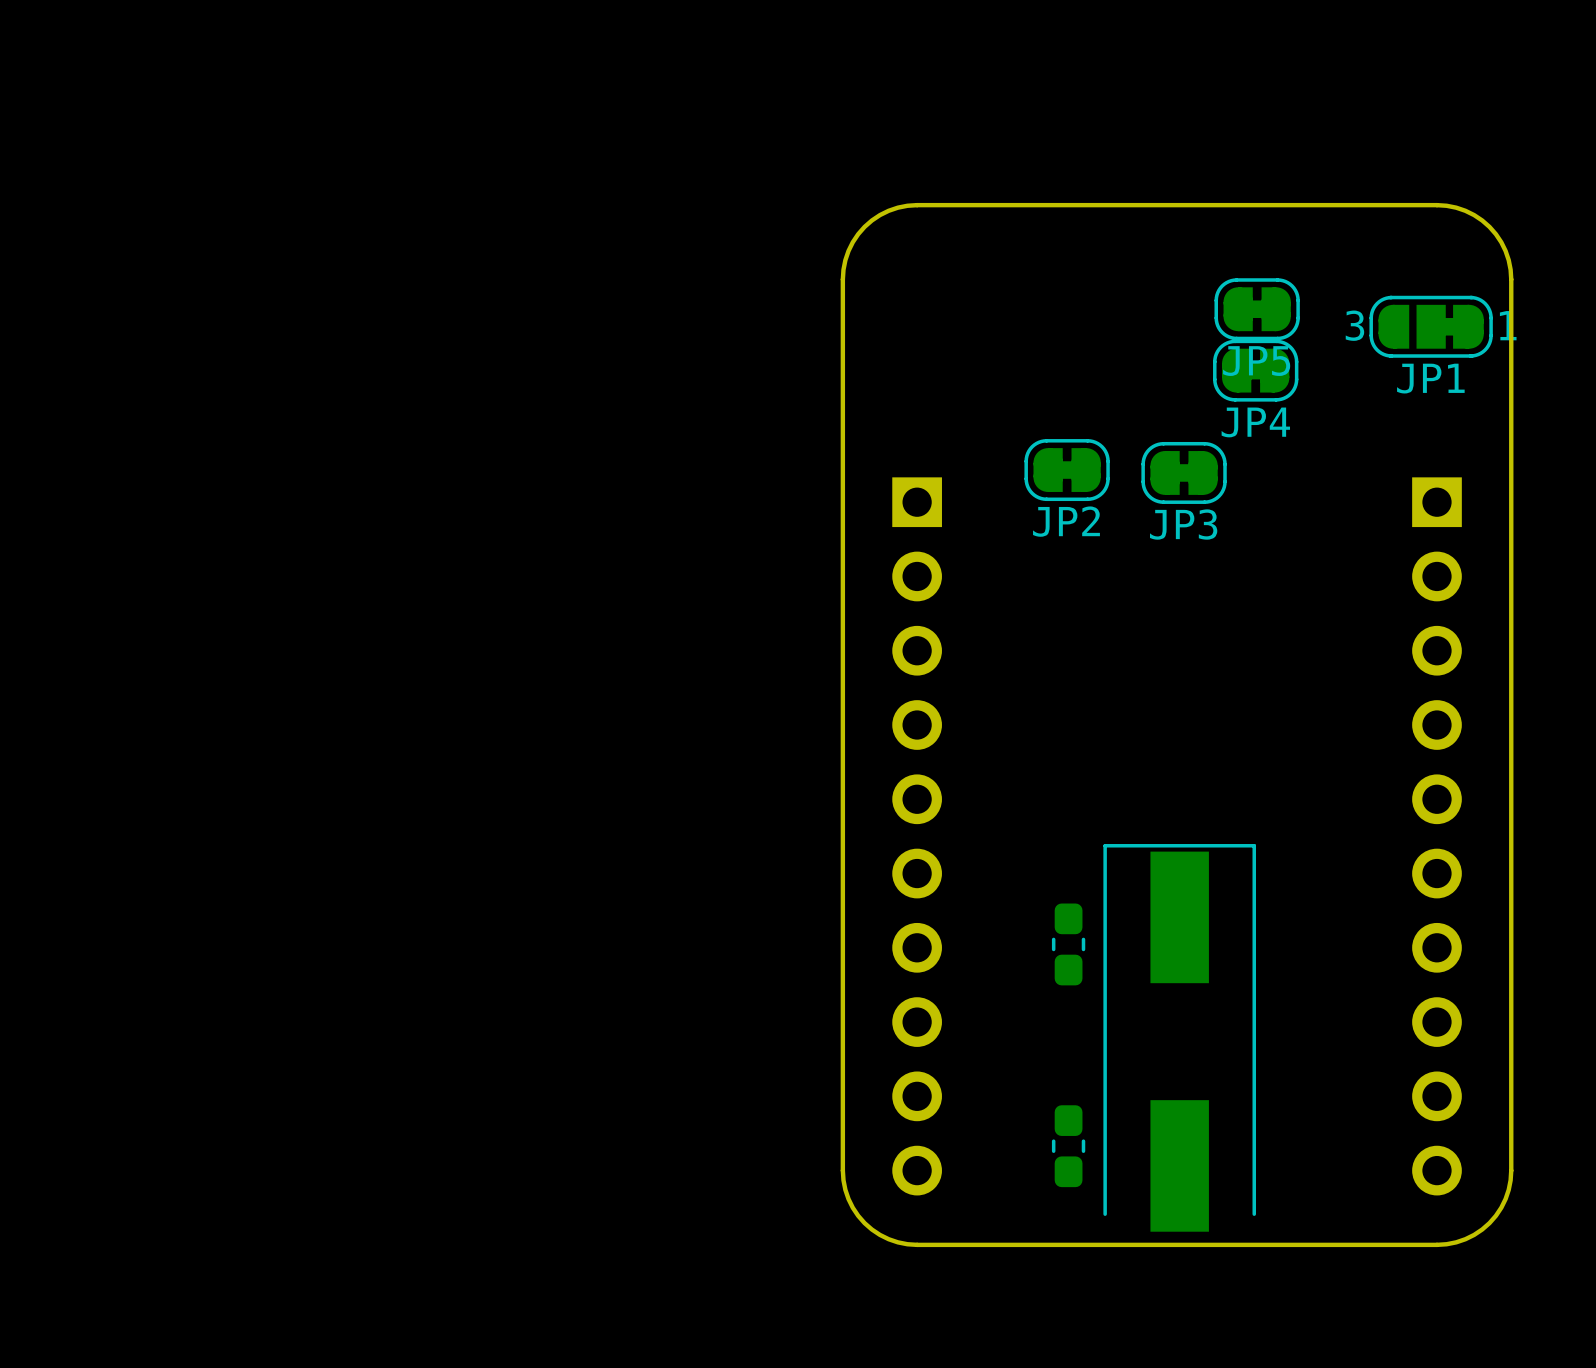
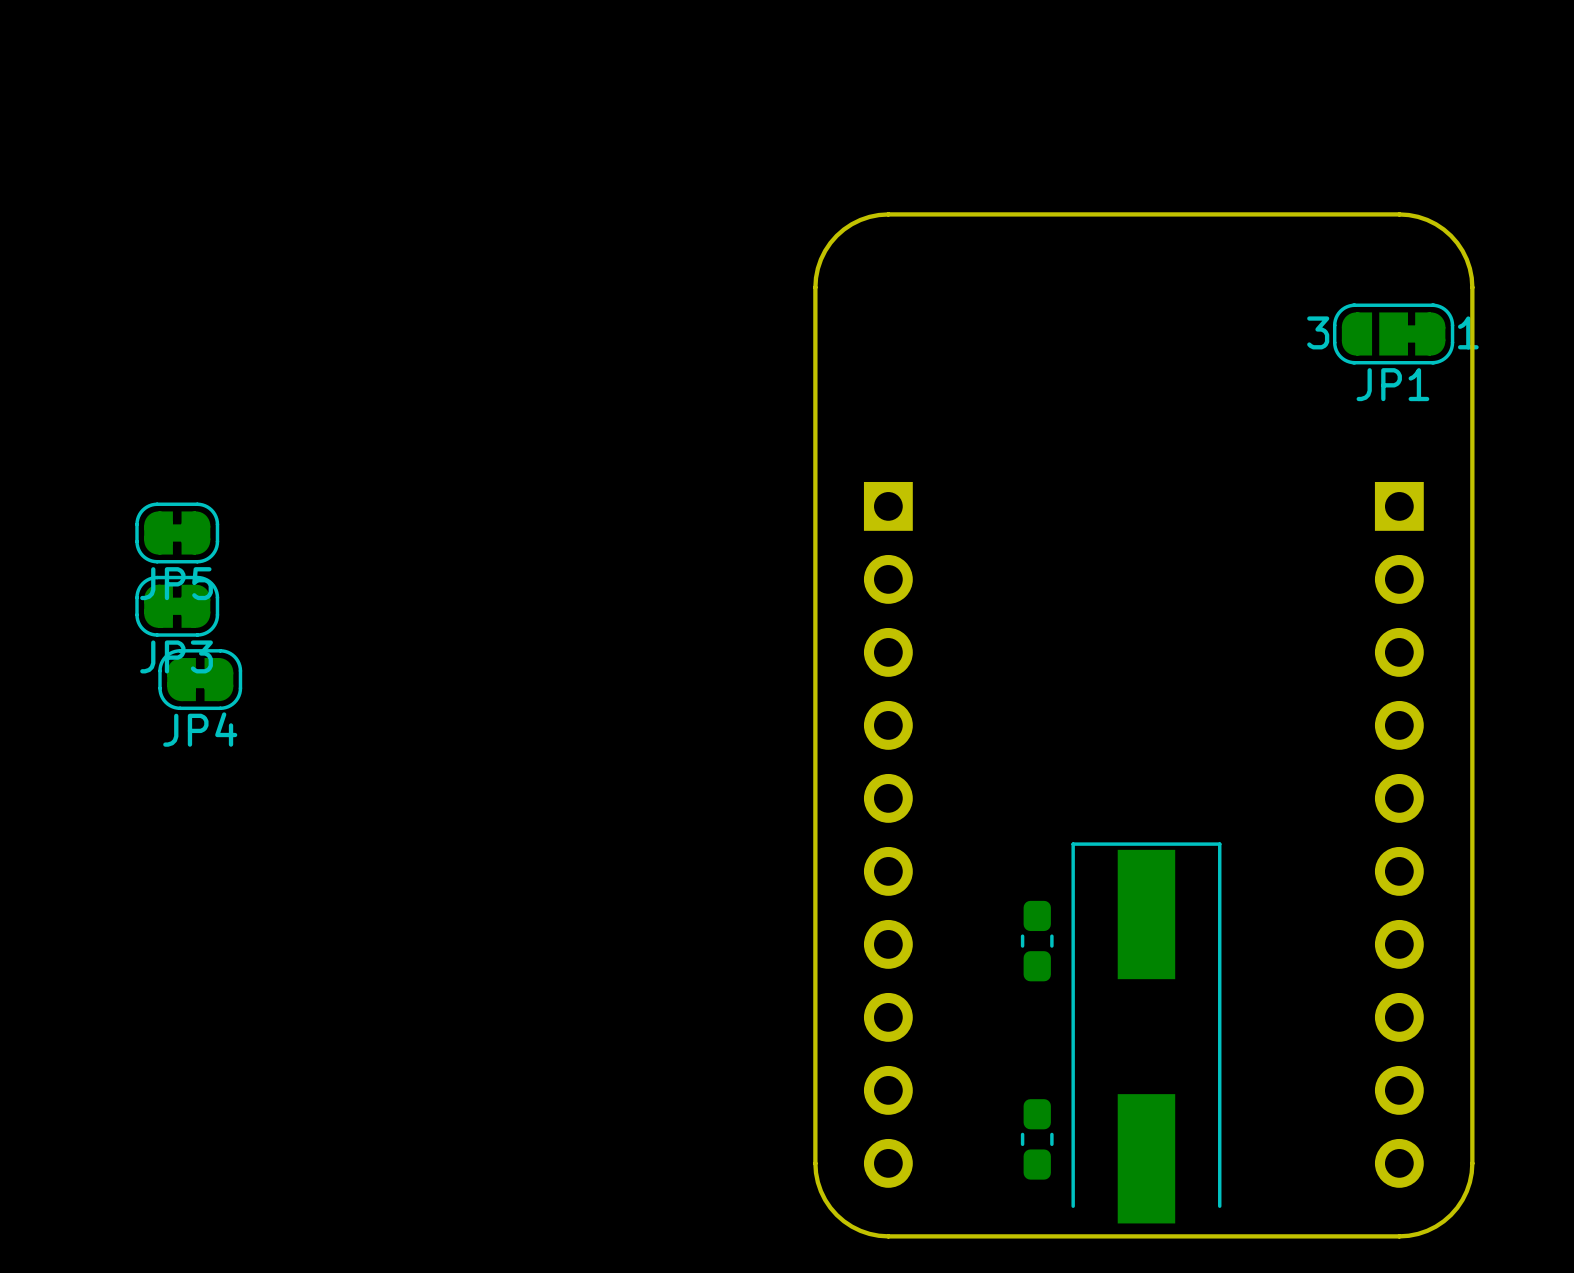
JP5 position: (1257, 309) -> (177, 532)
JP4 position: (1255, 370) -> (200, 679)
JP2: (1067, 470) -> none
JP3 position: (1184, 472) -> (177, 606)

